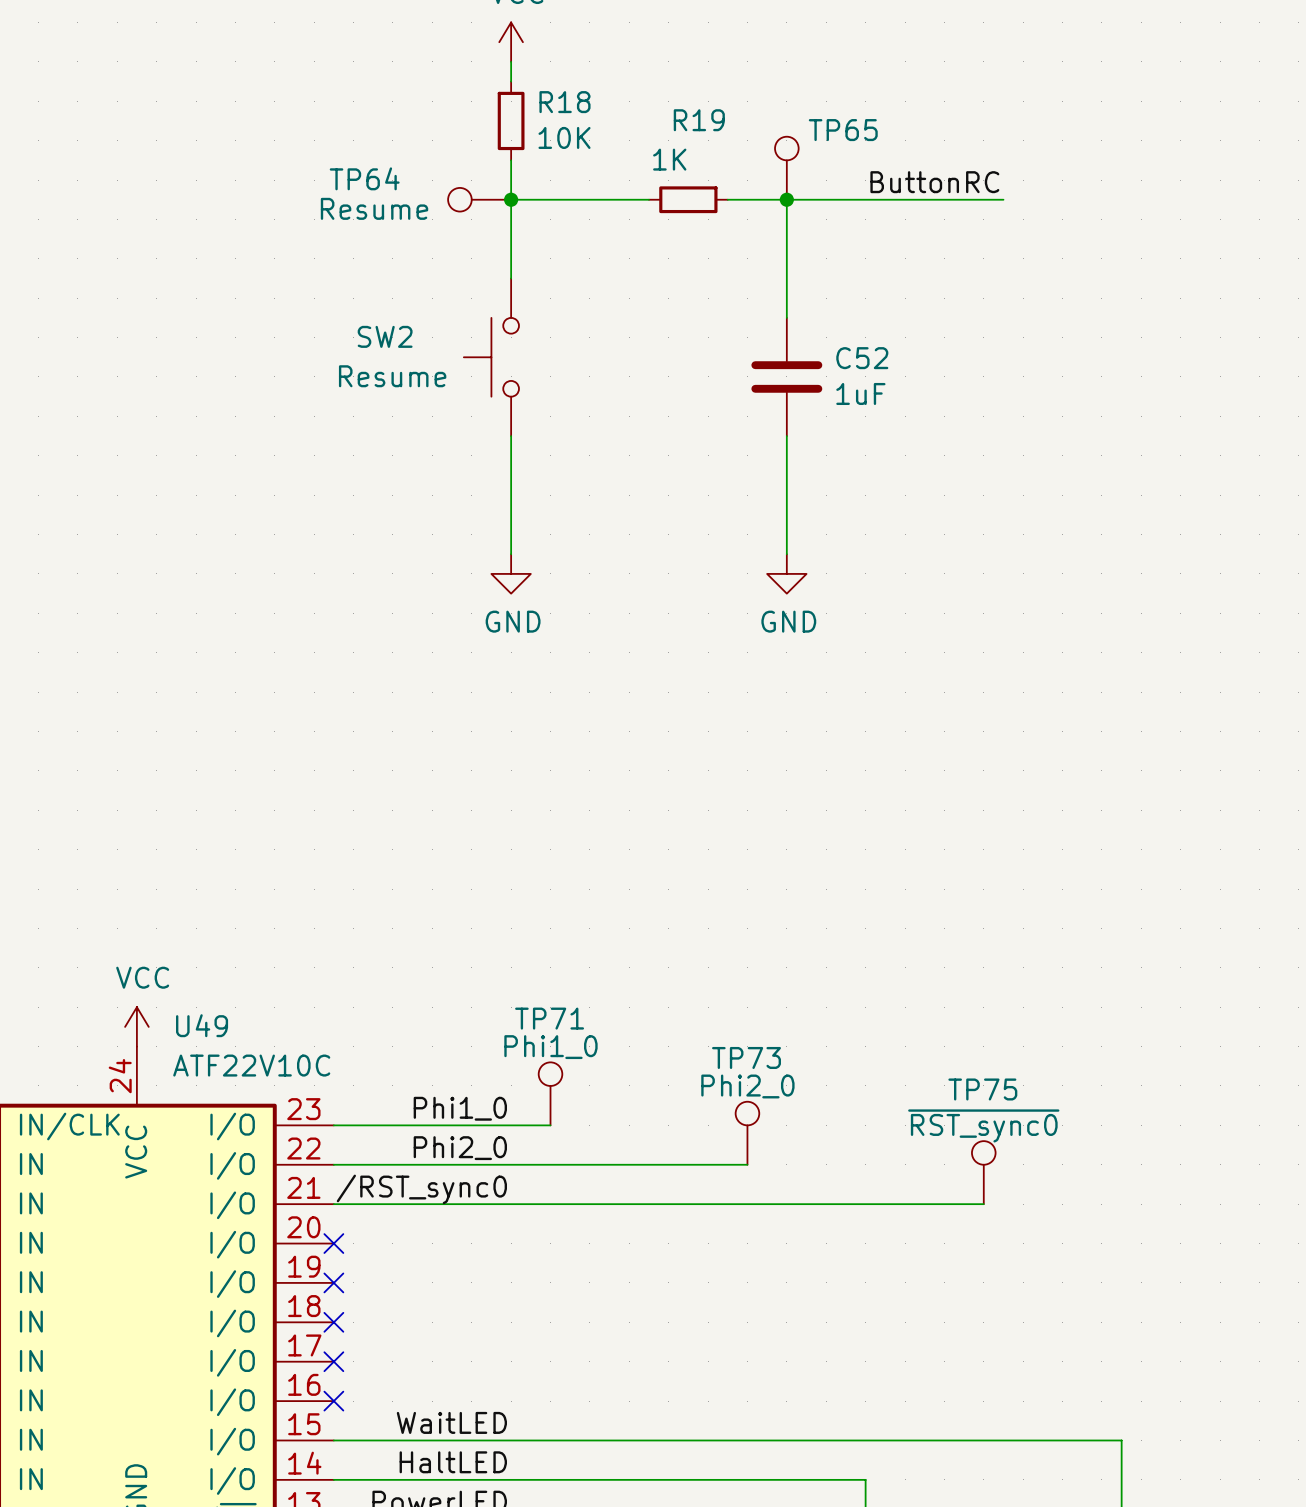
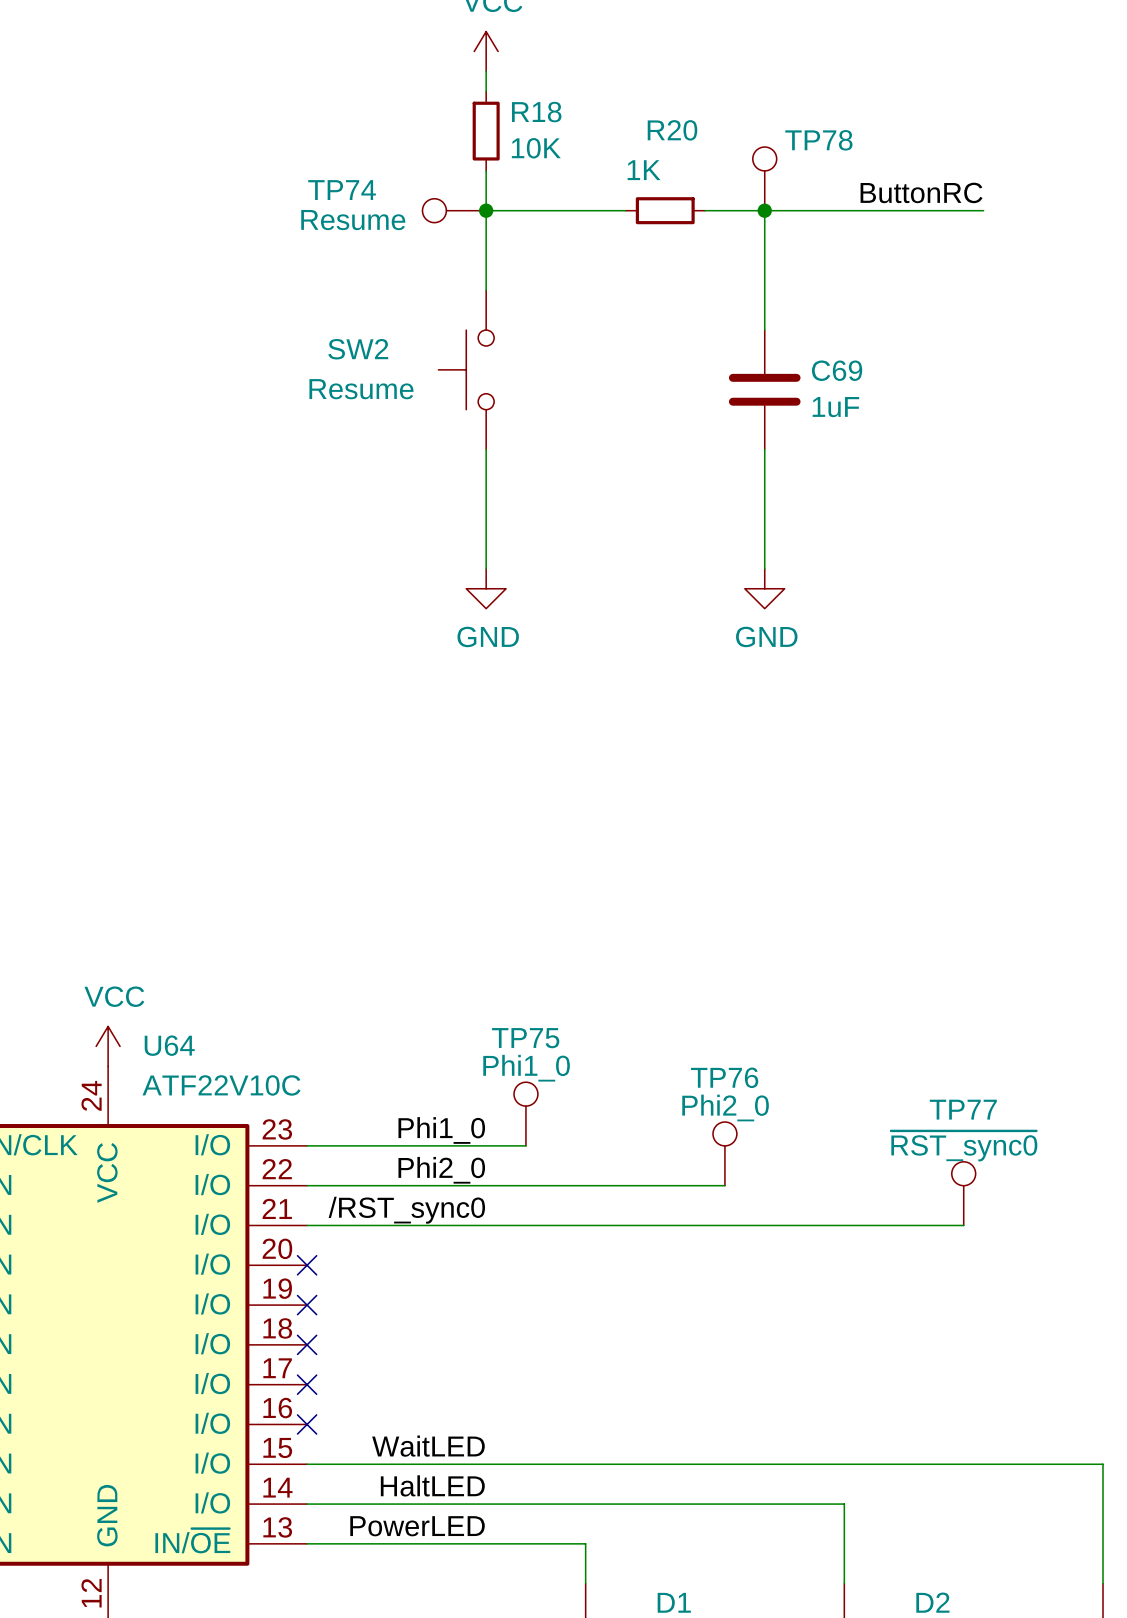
R19 name: R19 (699, 120) -> R20 (672, 130)
TP65 name: TP65 (843, 130) -> TP78 (818, 140)
TP64 name: TP64 (364, 178) -> TP74 (342, 190)
C52 name: C52 (862, 358) -> C69 (837, 370)
TP71 name: TP71 (549, 1018) -> TP75 (525, 1038)
U49 name: U49 (202, 1025) -> U64 (169, 1045)
TP73 name: TP73 (746, 1057) -> TP76 (724, 1077)
TP75 name: TP75 (982, 1089) -> TP77 (963, 1109)

